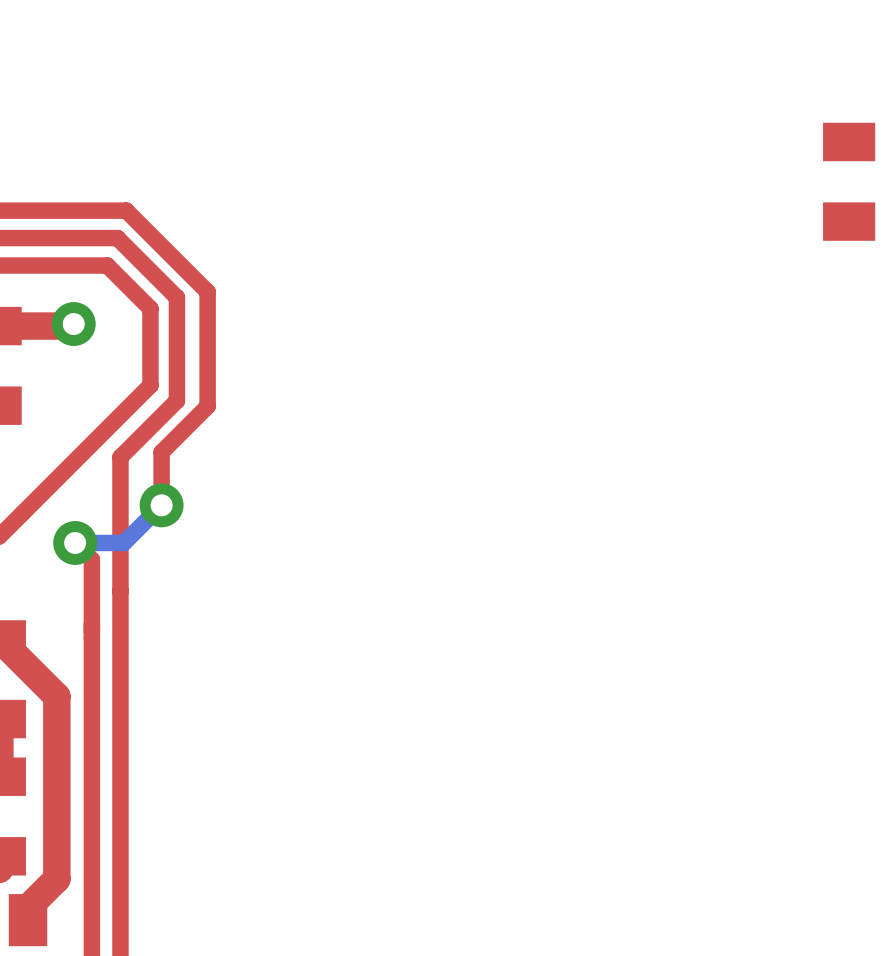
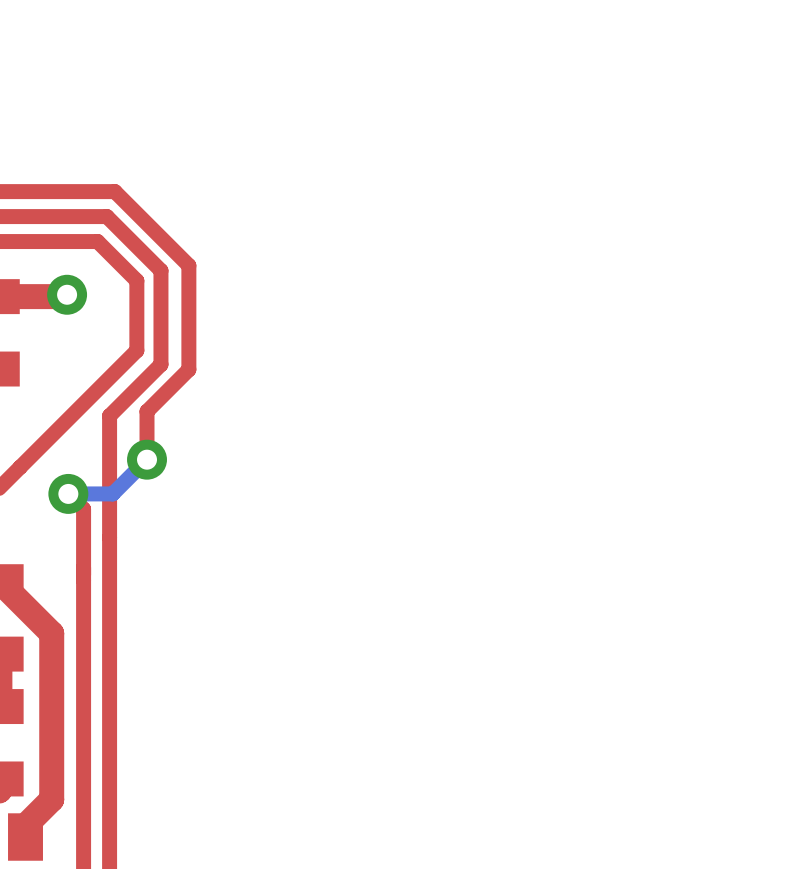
part: (849, 181) -> none

